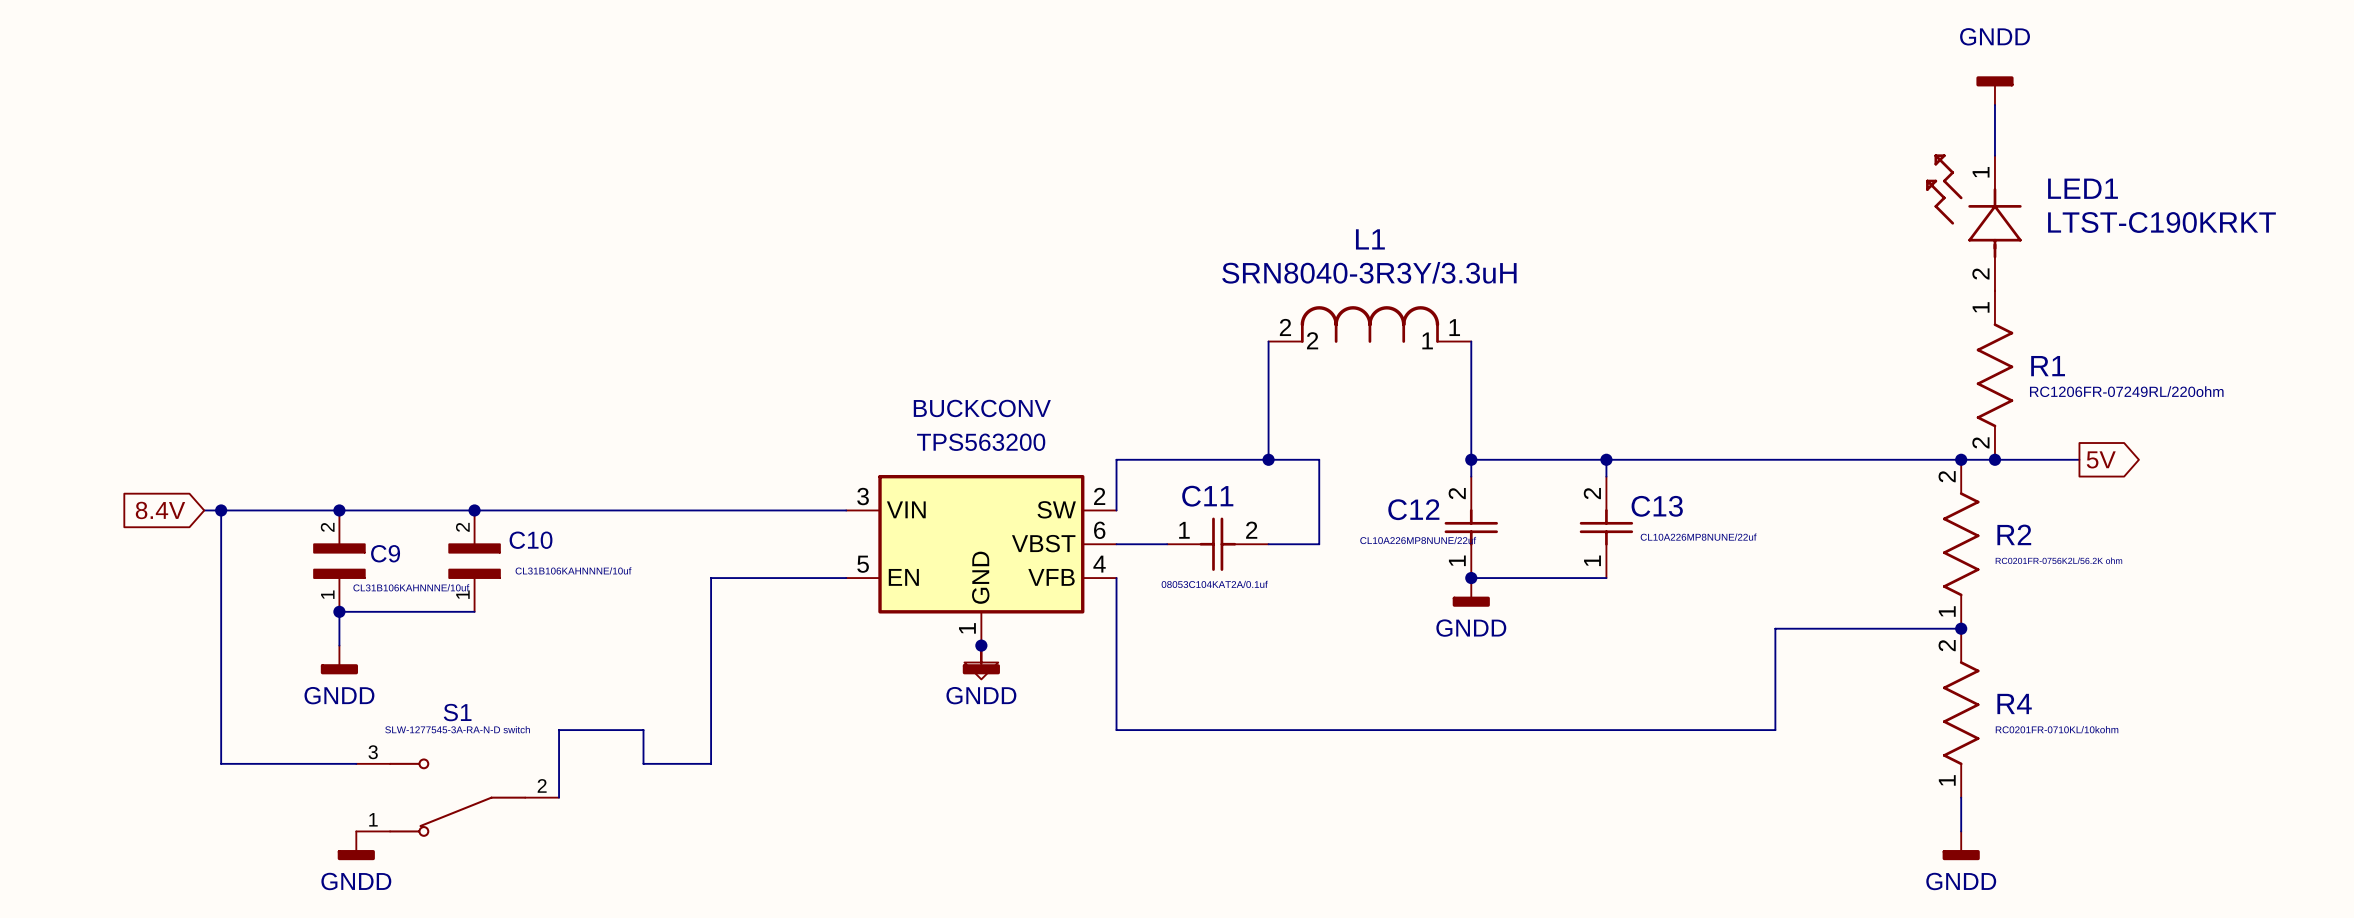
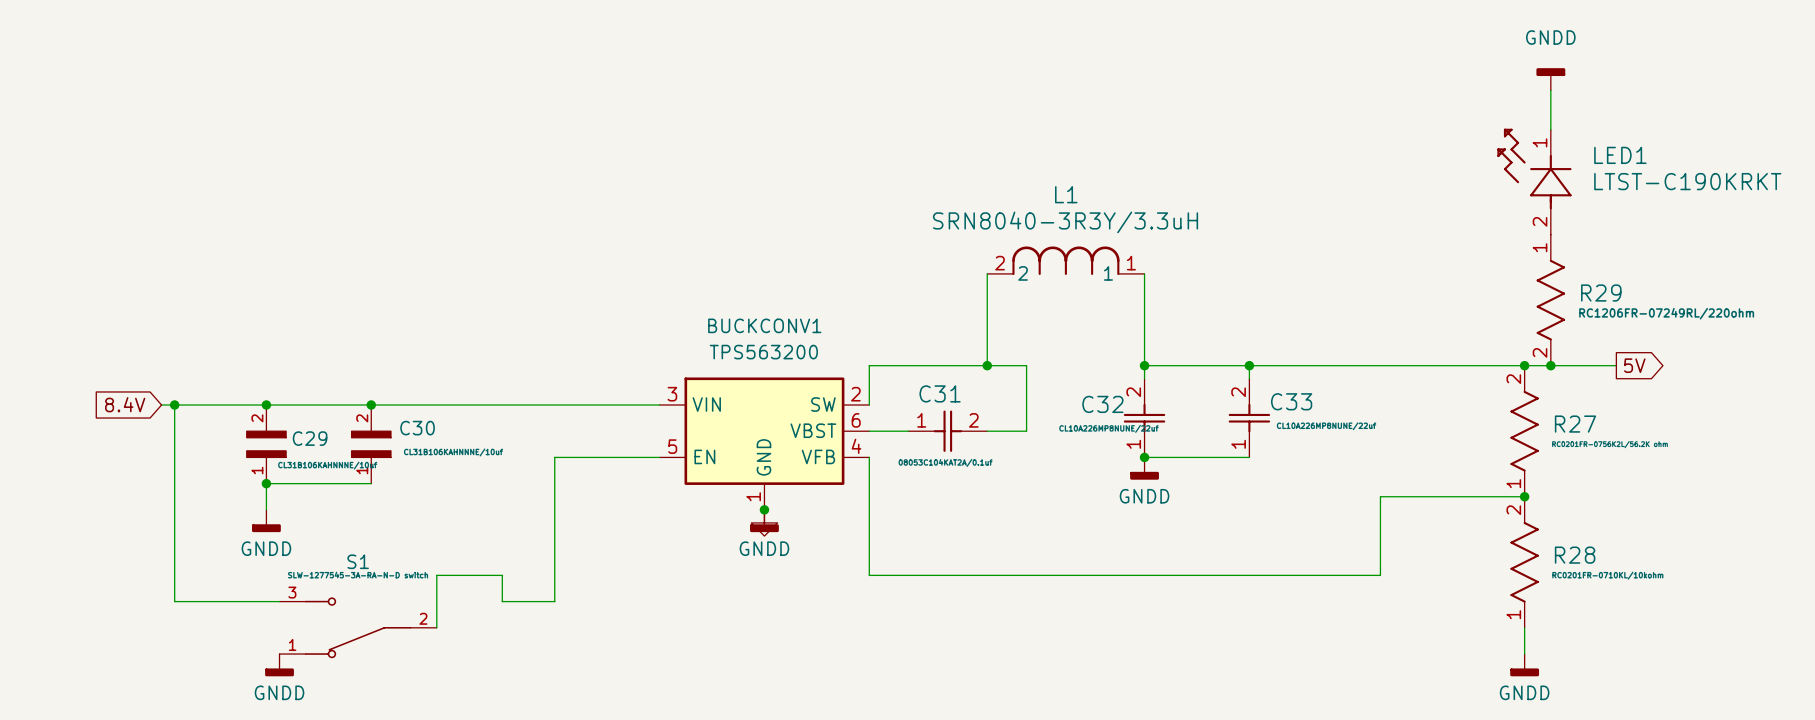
R1 name: R1 (2048, 366) -> R29 (1601, 293)
BUCKCONV name: BUCKCONV (982, 408) -> BUCKCONV1 (764, 325)
C11 name: C11 (1207, 496) -> C31 (940, 393)
C13 name: C13 (1657, 506) -> C33 (1291, 401)
C12 name: C12 (1413, 509) -> C32 (1102, 404)
R2 name: R2 (2014, 534) -> R27 (1575, 424)
C10 name: C10 (531, 540) -> C30 (417, 428)
C9 name: C9 (385, 553) -> C29 (310, 438)
R4 name: R4 (2014, 703) -> R28 (1575, 555)

